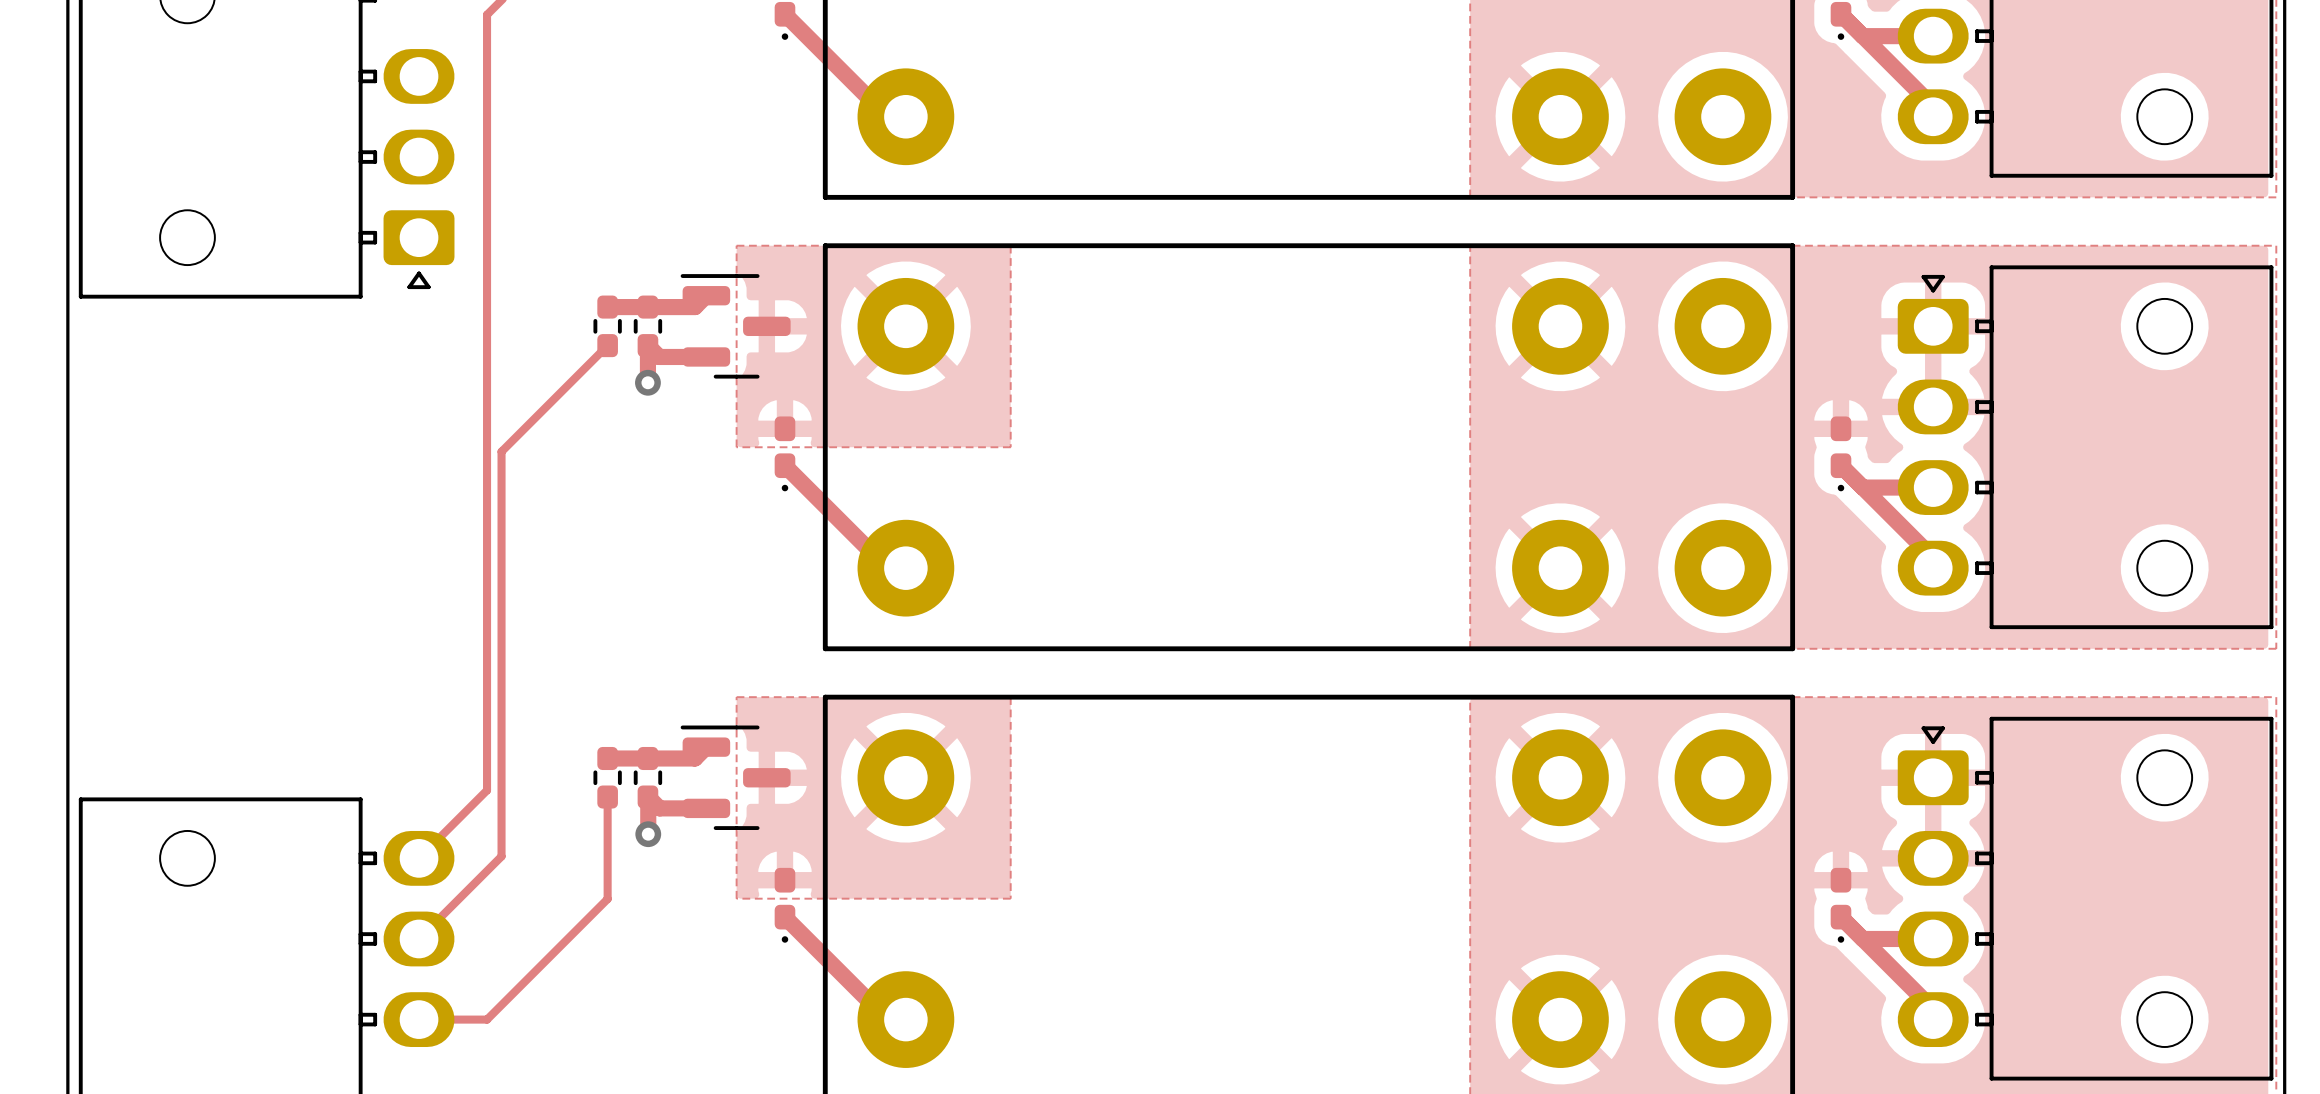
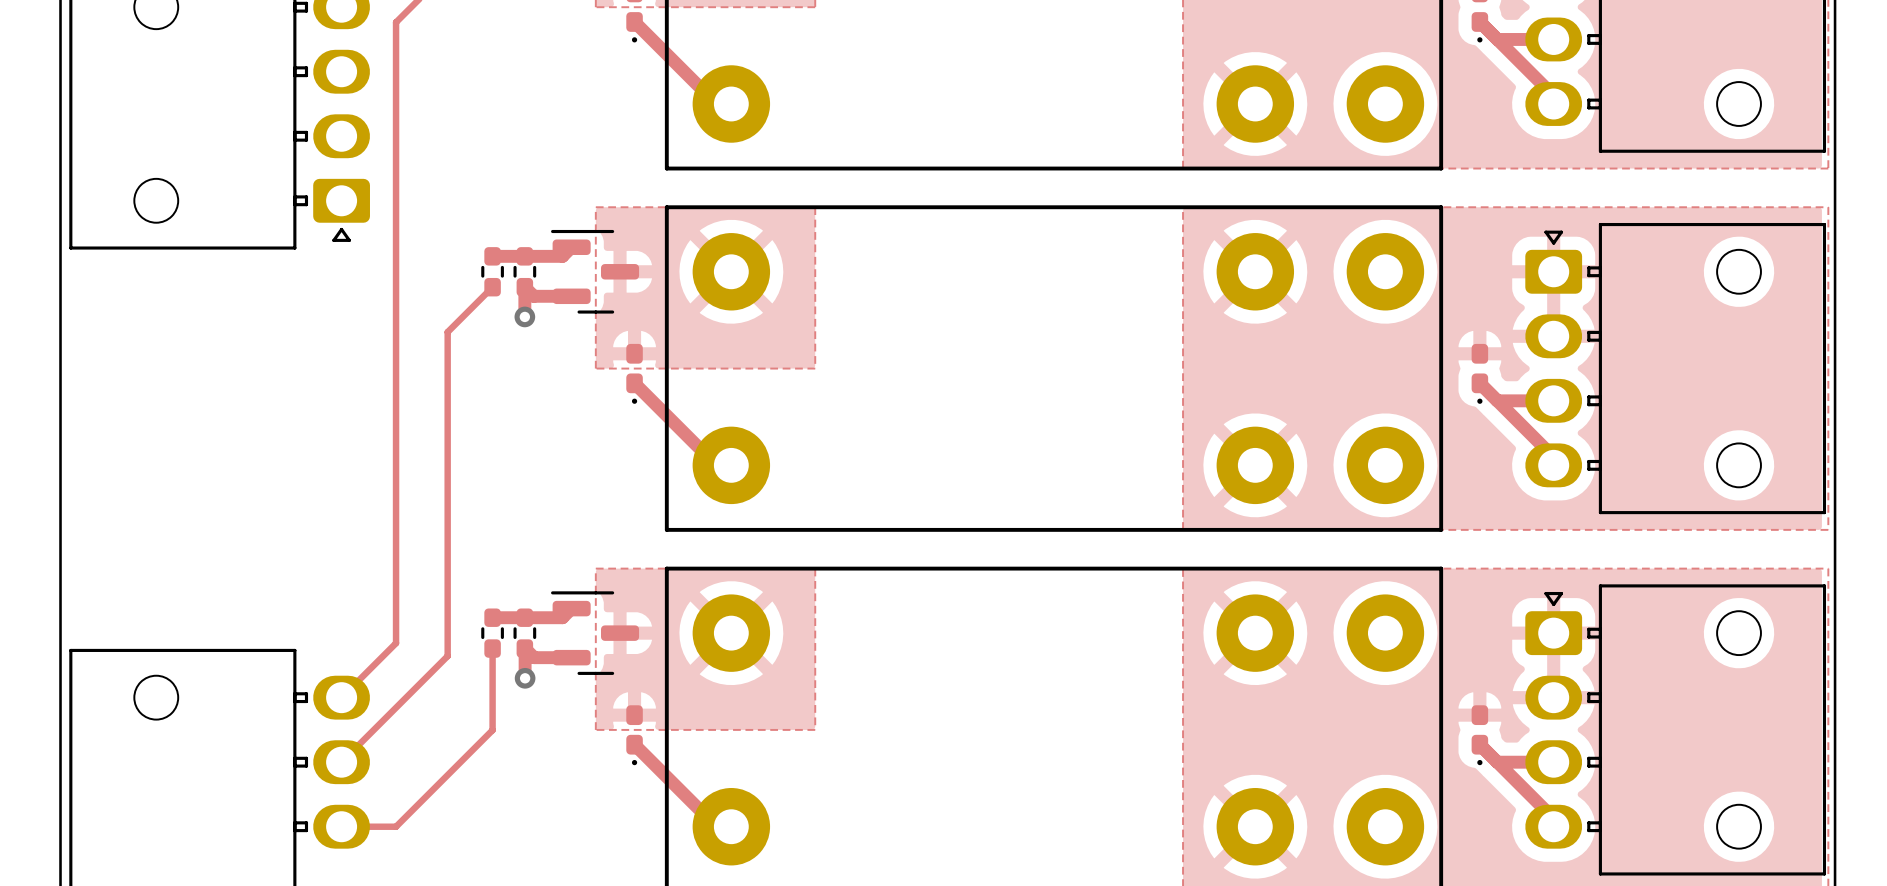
track: (551, 401) (501, 451) (501, 856) -> (447, 332) (447, 656) (407, 696)

